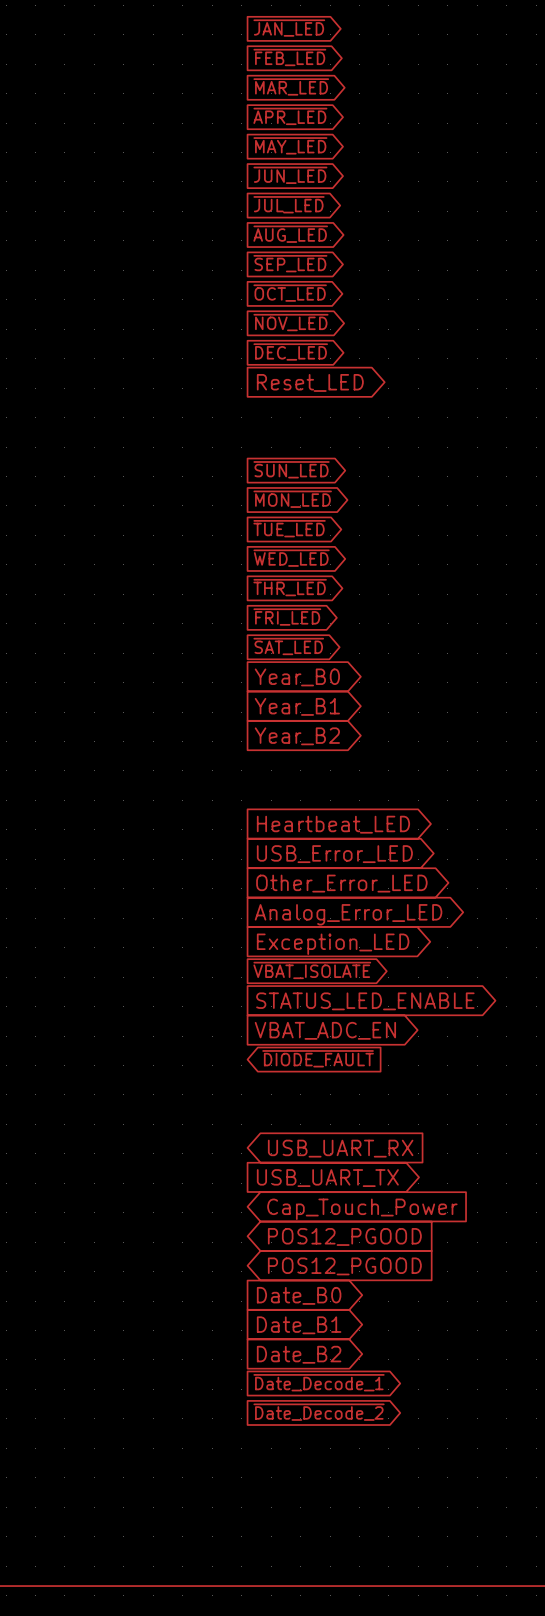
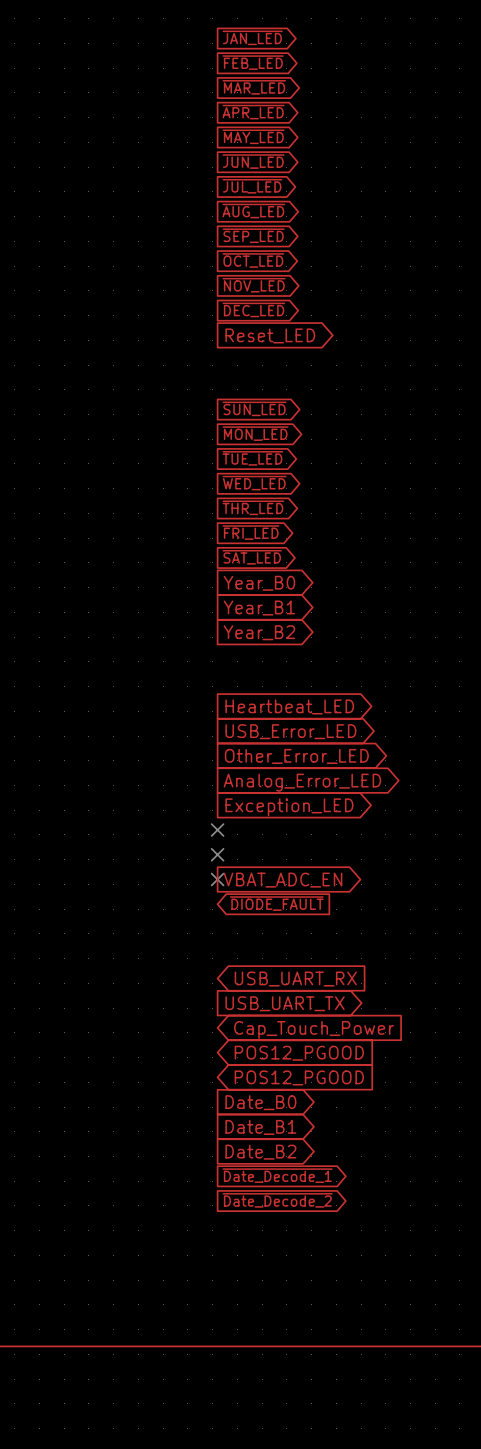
global label: ~{VBAT_ISOLATE} (312, 970) -> none
no-connect mark: none -> (217, 830)
no-connect mark: none -> (217, 854)
global label: STATUS_LED_ENABLE (365, 1001) -> none
no-connect mark: none -> (217, 879)

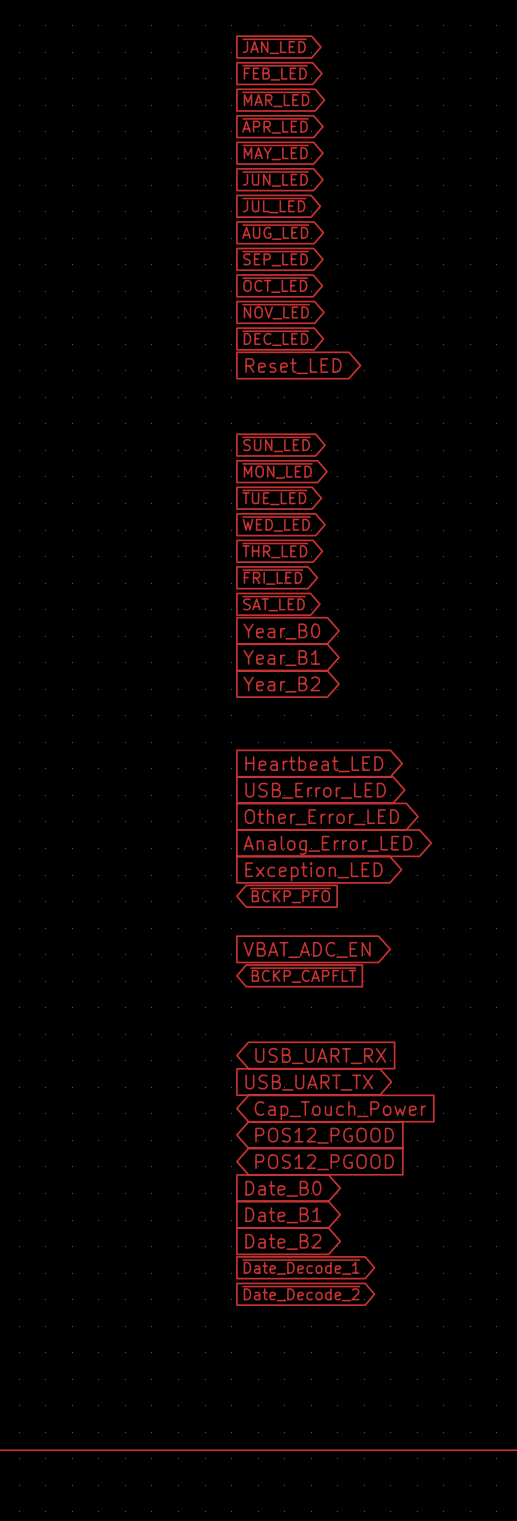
global label: none -> ~{BCKP_PFO} (290, 895)
no-connect mark: (217, 830) -> none
no-connect mark: (217, 854) -> none
no-connect mark: (217, 879) -> none
global label: ~{DIODE_FAULT} (276, 903) -> ~{BCKP_CAPFLT} (303, 975)

